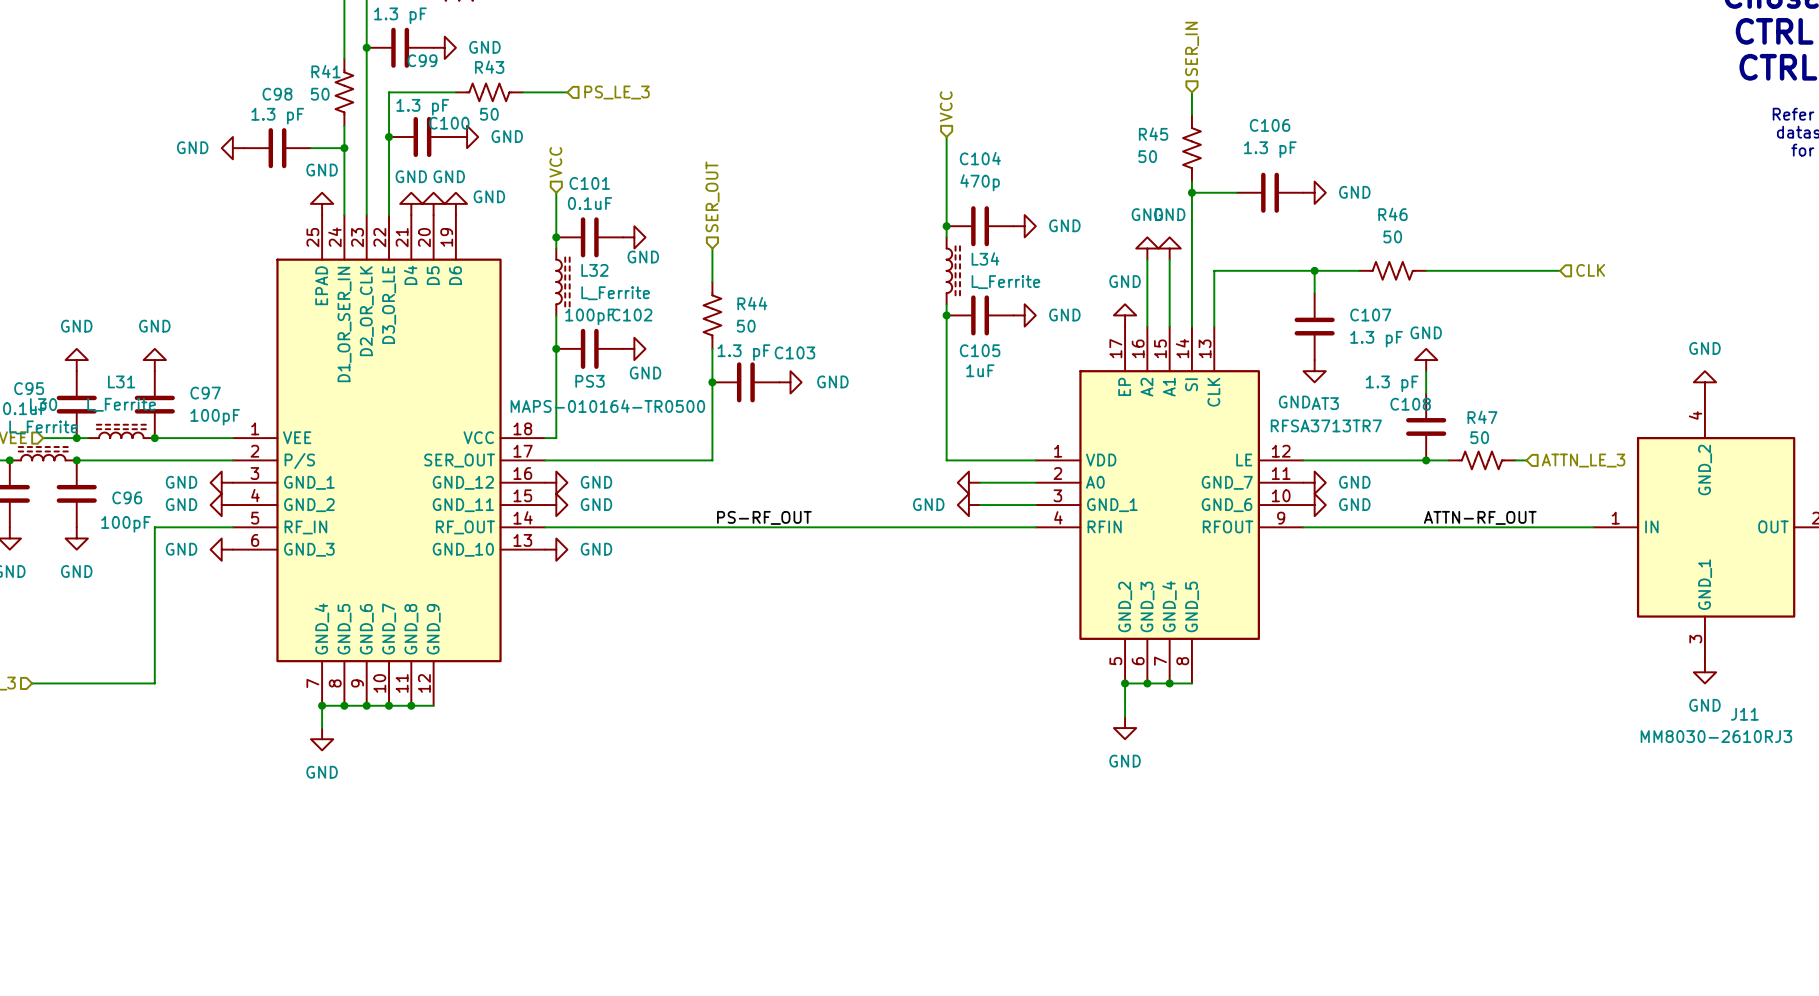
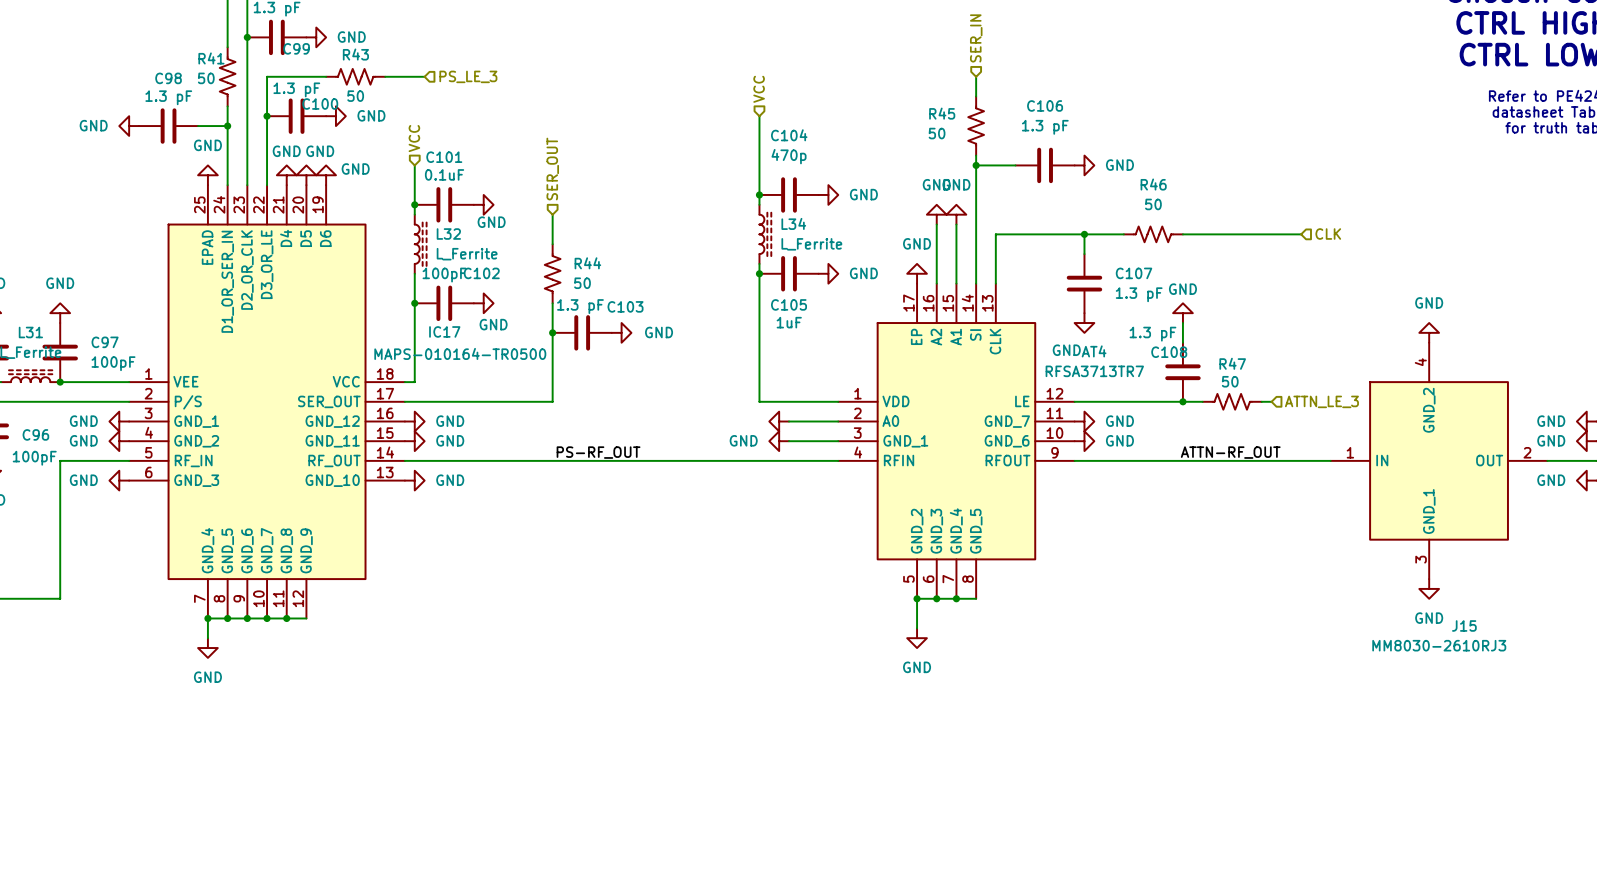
PS3 name: PS3 (590, 381) -> IC17 (444, 331)
AT3 name: AT3 (1325, 403) -> AT4 (1094, 351)
J11 name: J11 (1744, 714) -> J15 (1464, 625)

